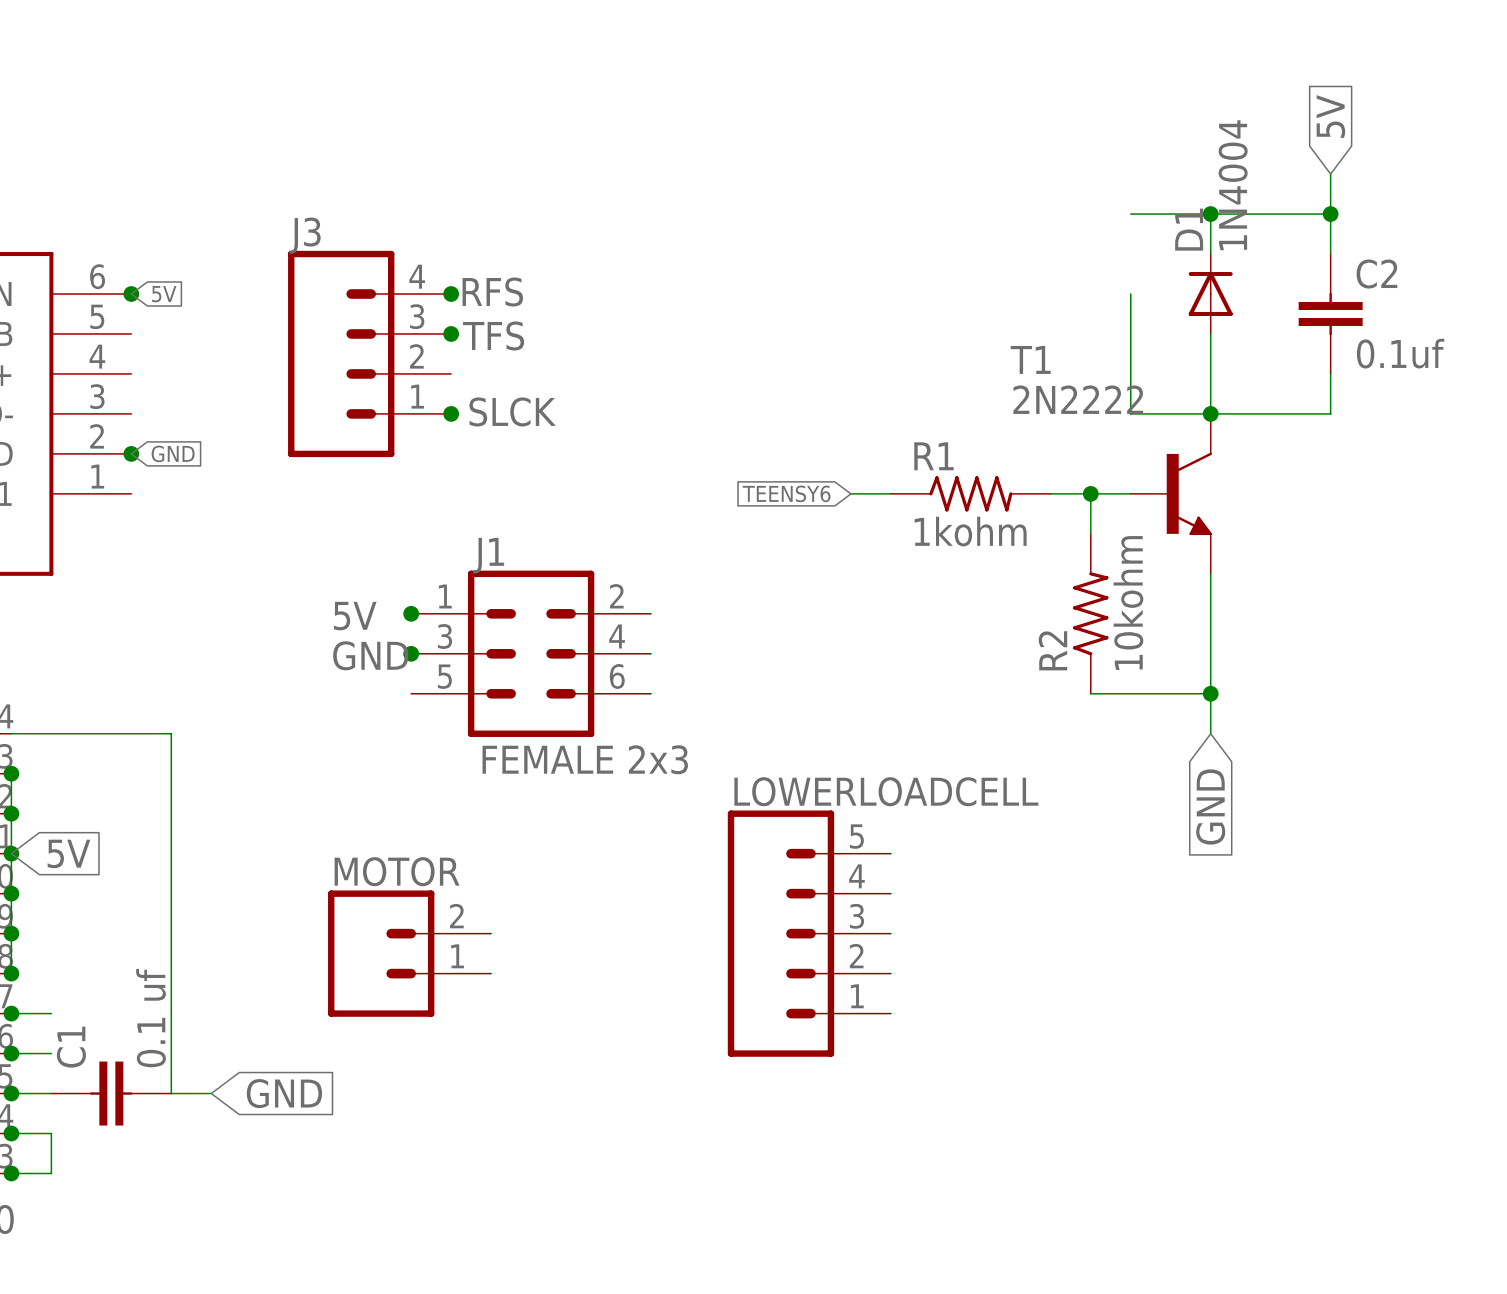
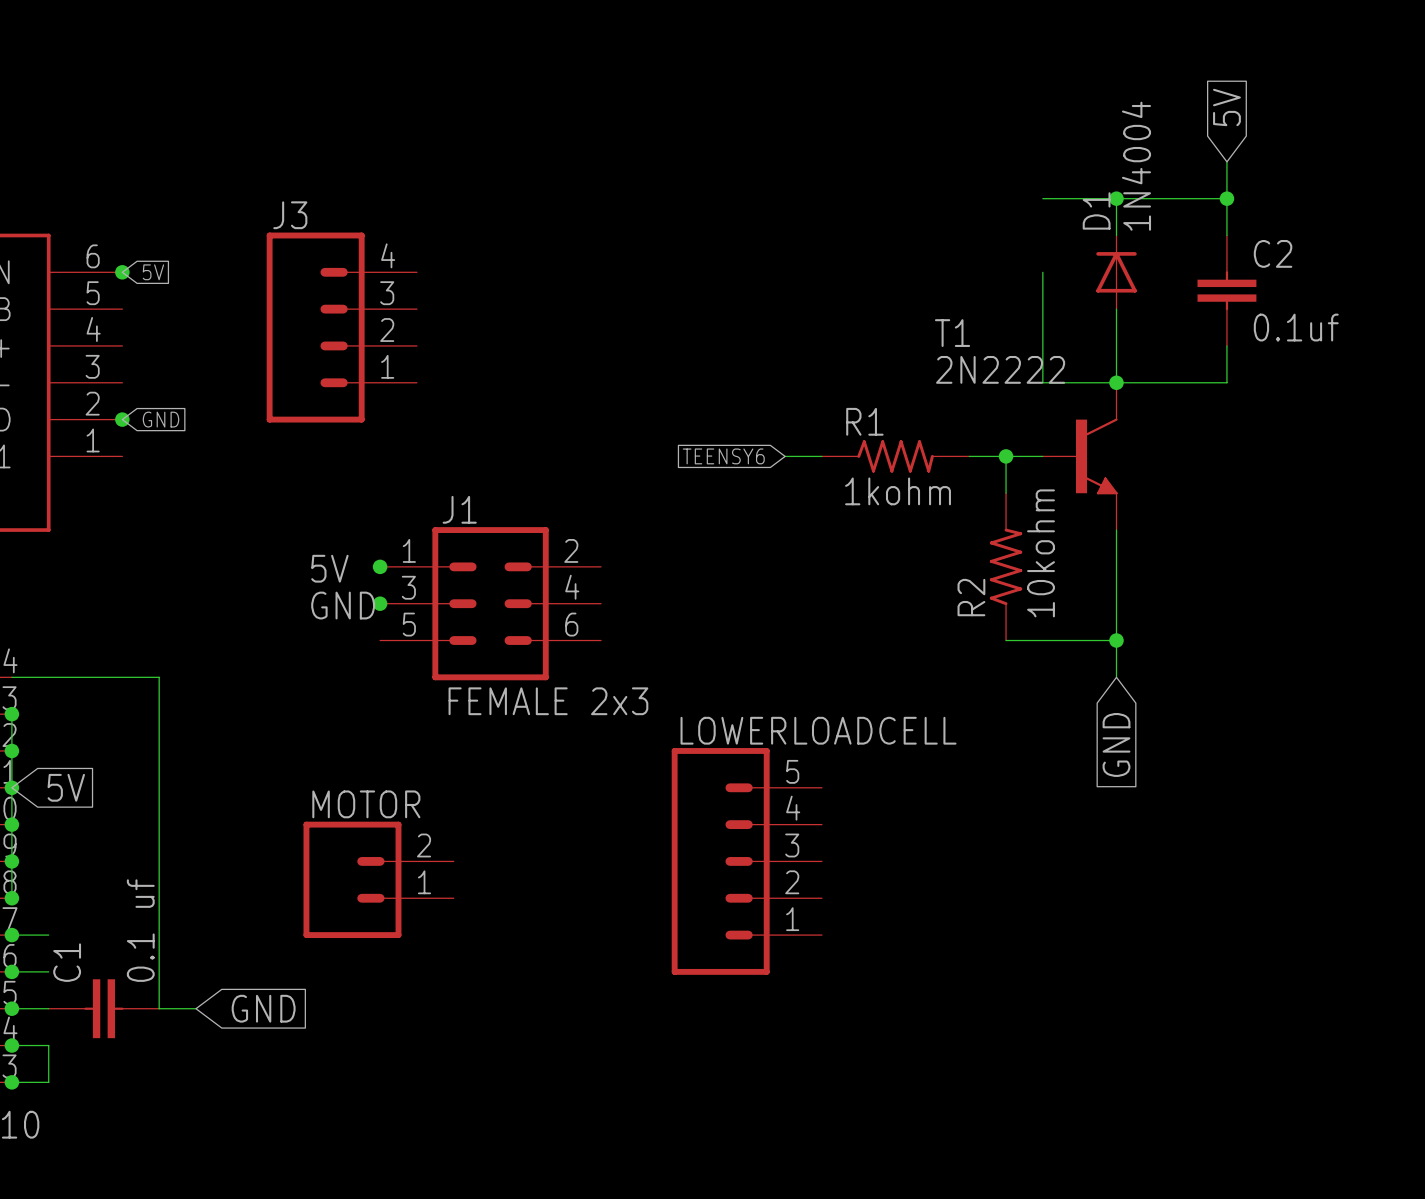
label: RFS (492, 292) -> none
junction: (451, 293) -> none
junction: (451, 333) -> none
label: TFS (493, 335) -> none
label: SLCK (512, 411) -> none
junction: (451, 413) -> none

